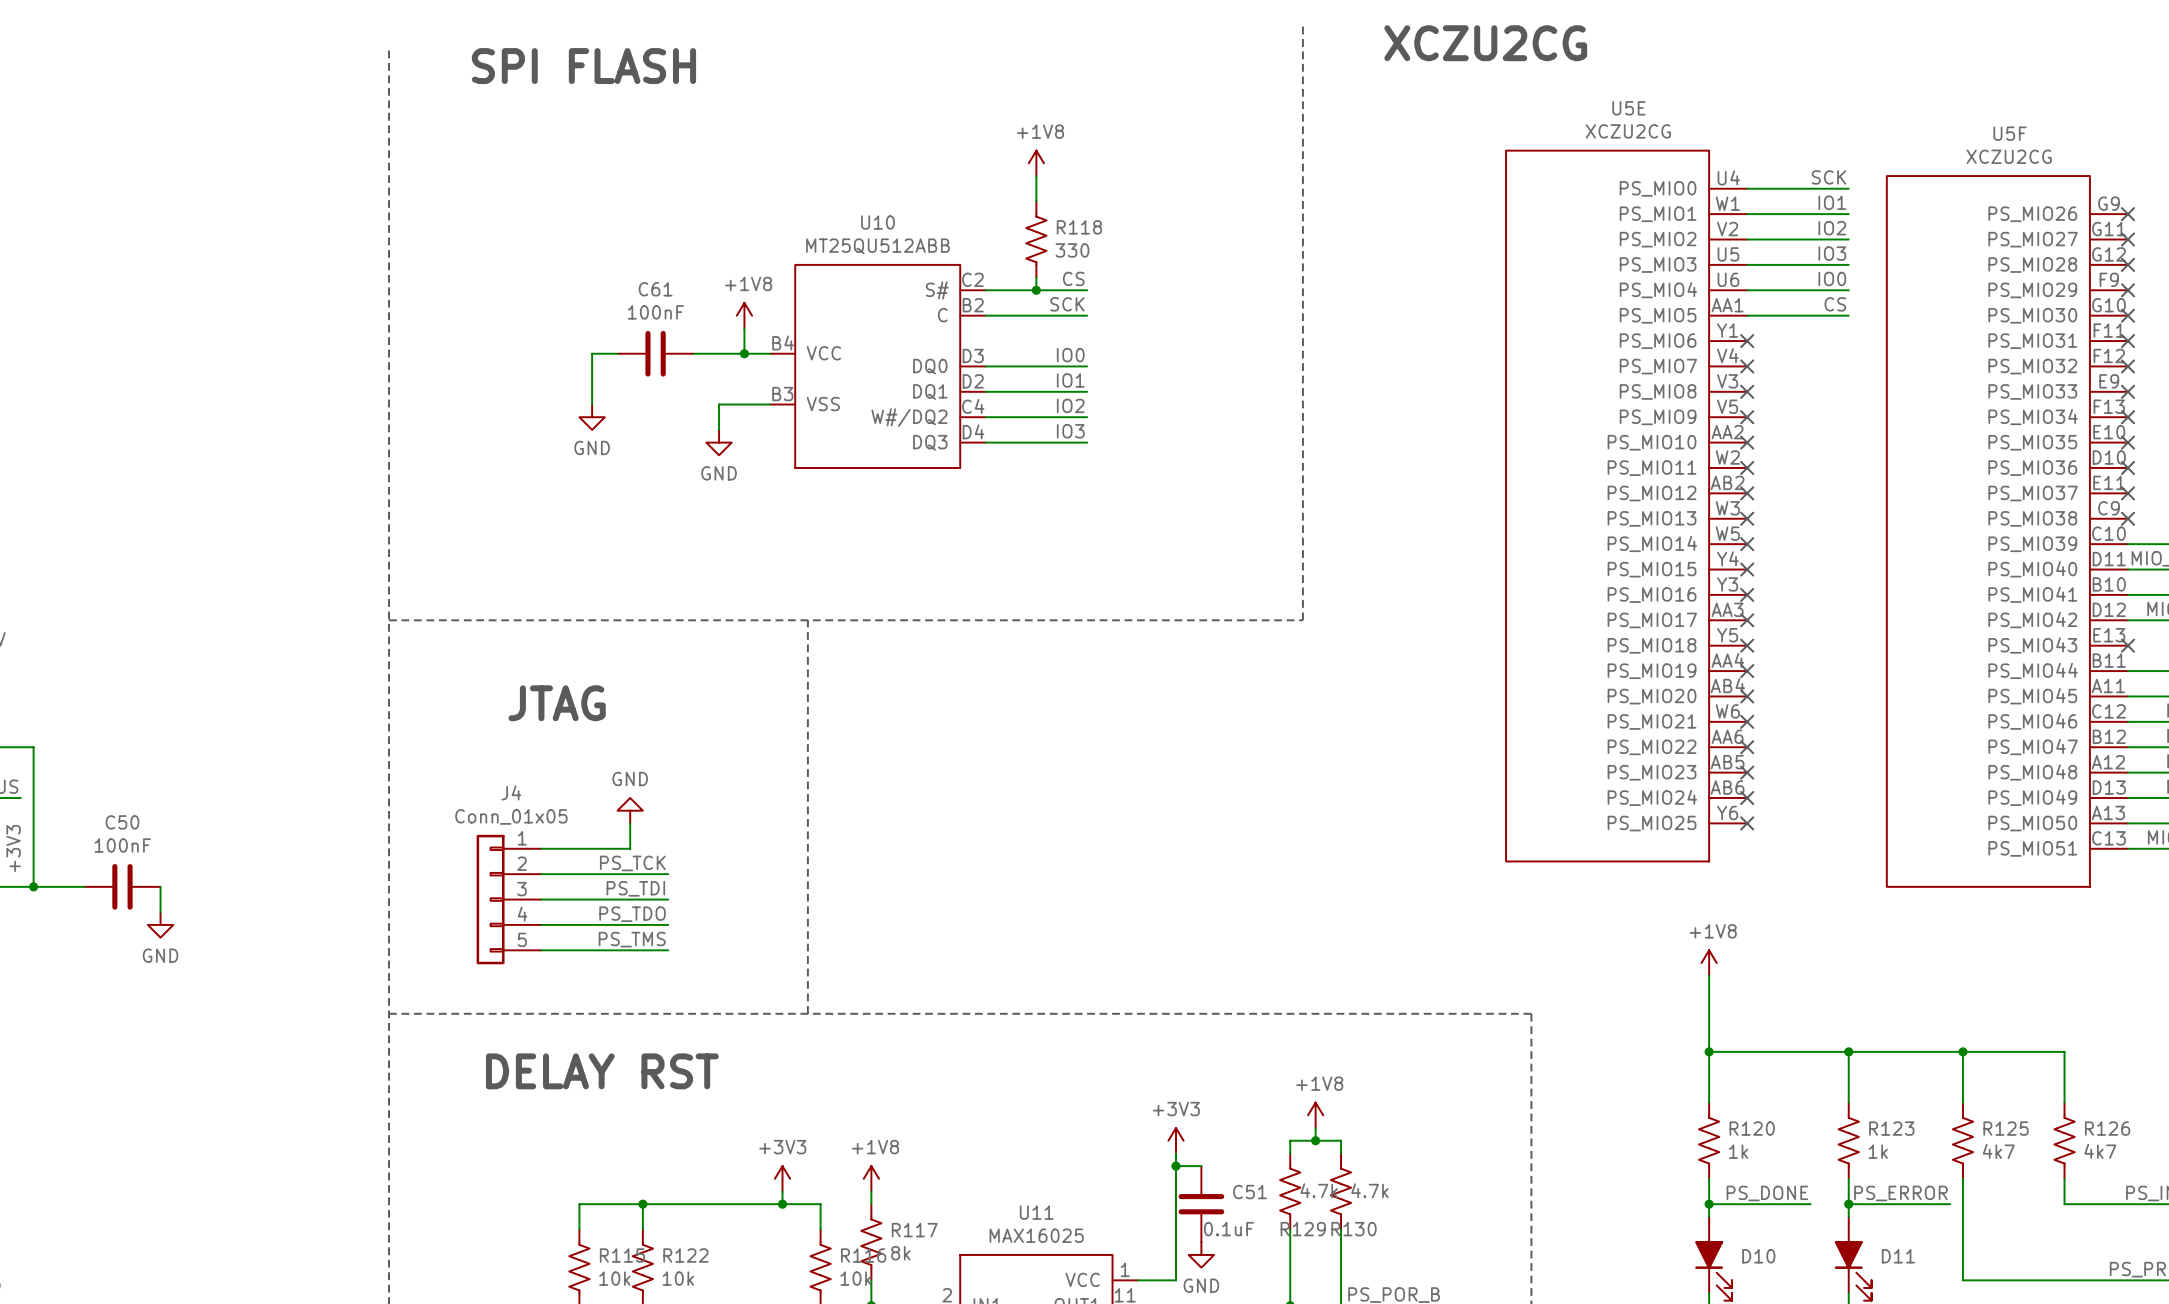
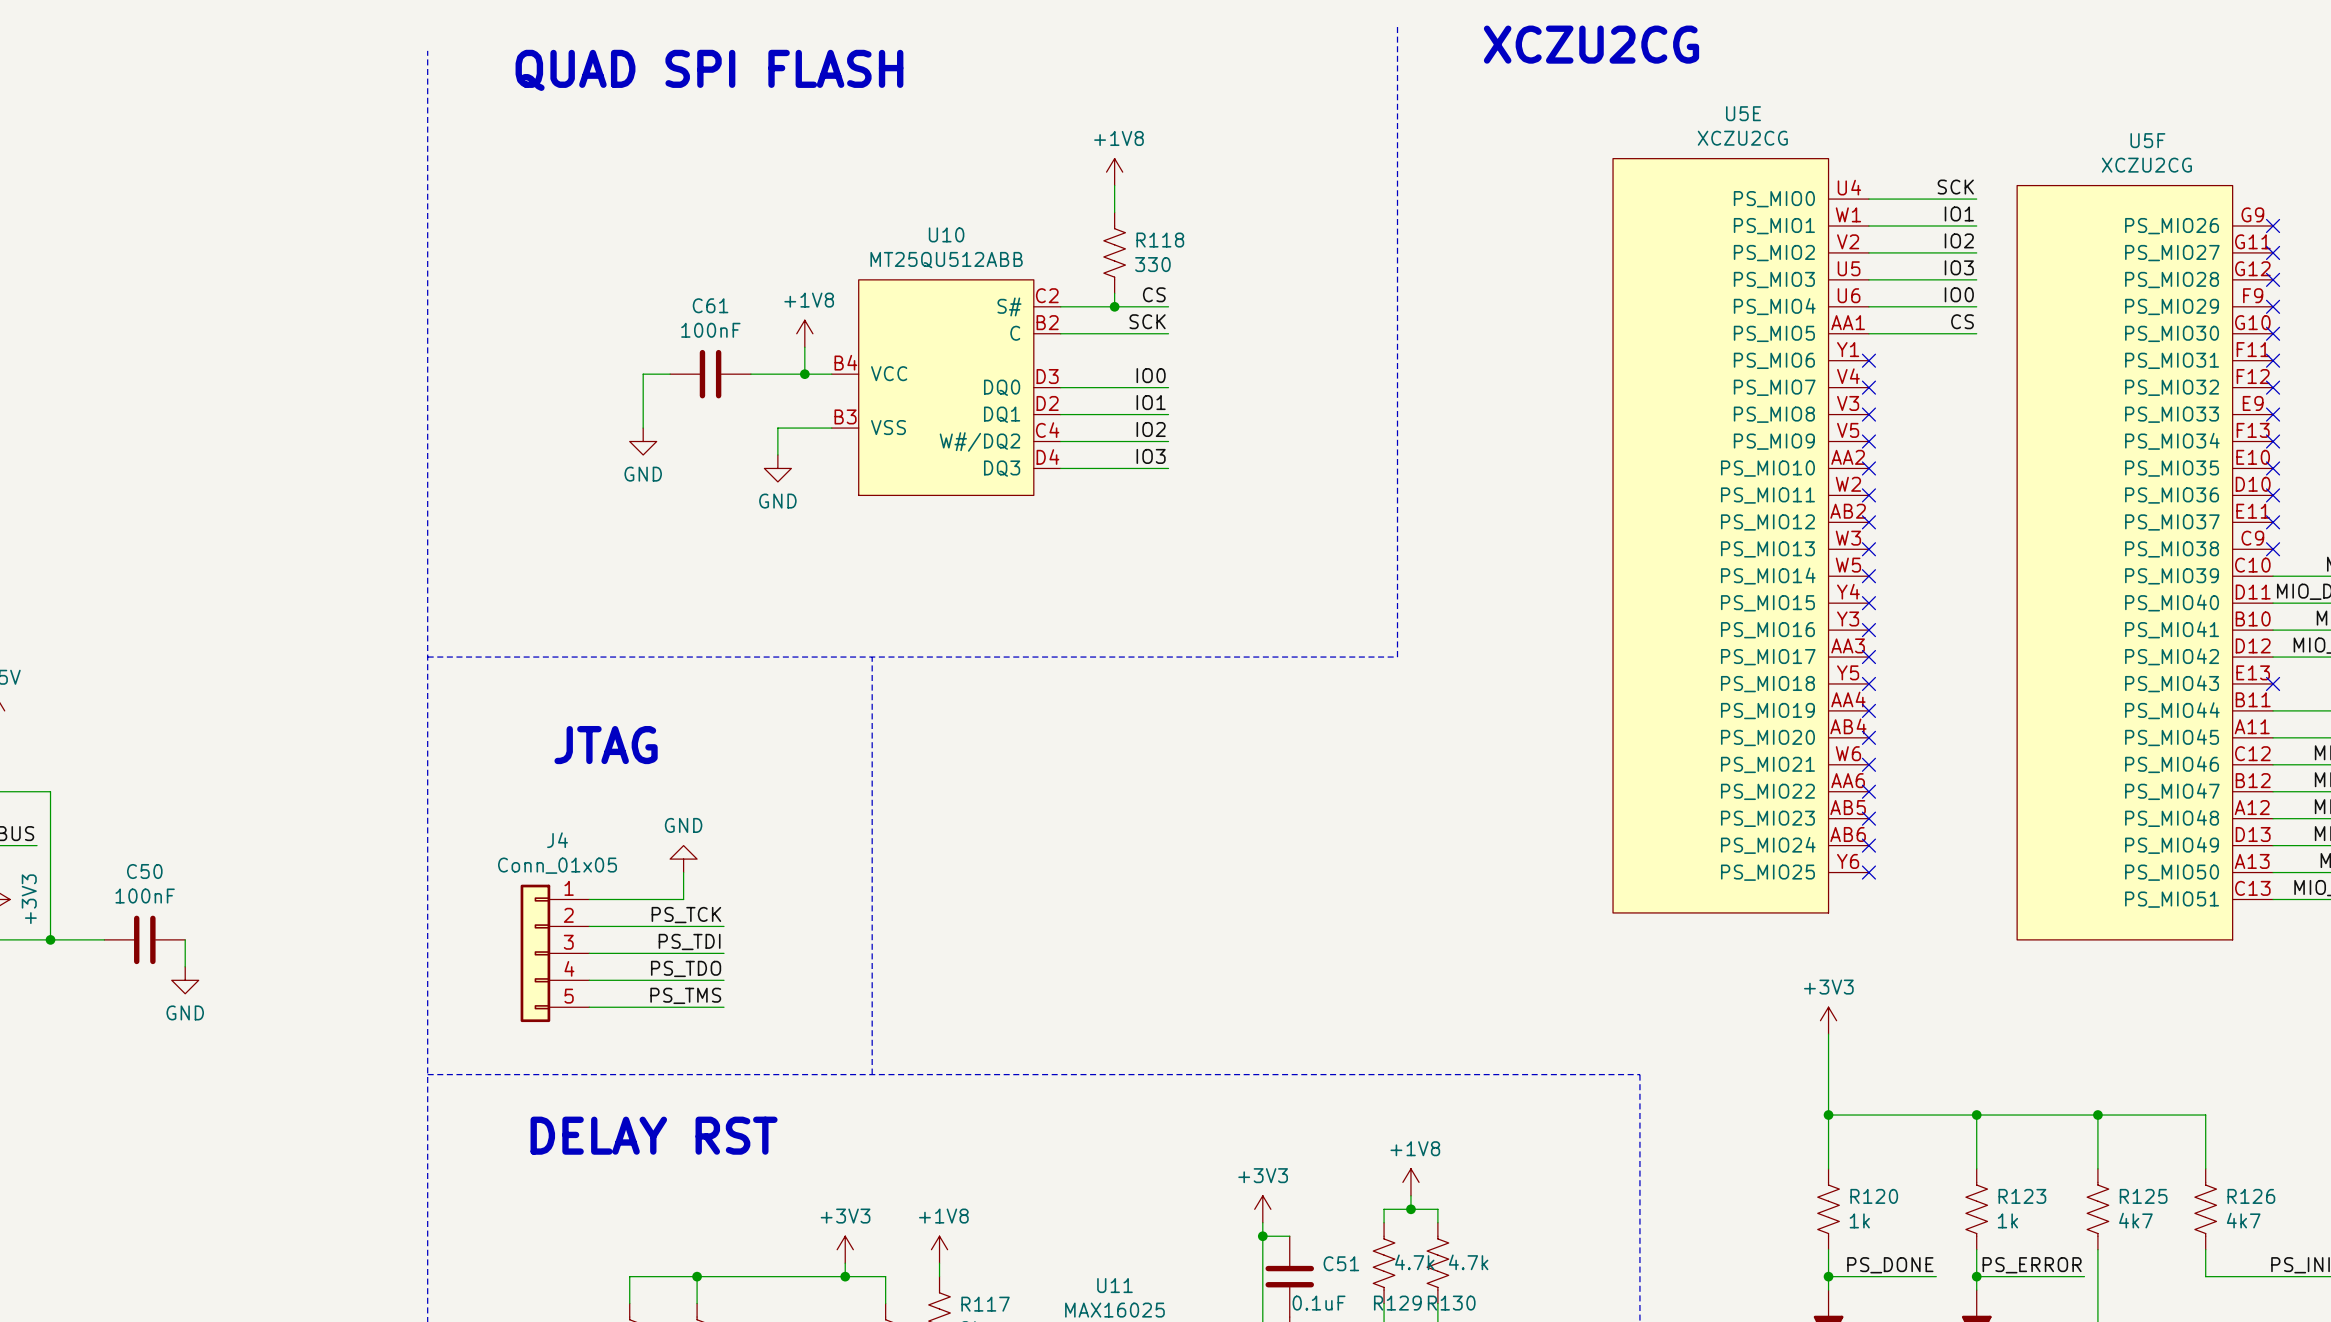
text: SPI FLASH (583, 66) -> QUAD SPI FLASH (709, 70)
power symbol: +1V8 (1709, 963) -> +3V3 (1828, 1020)

